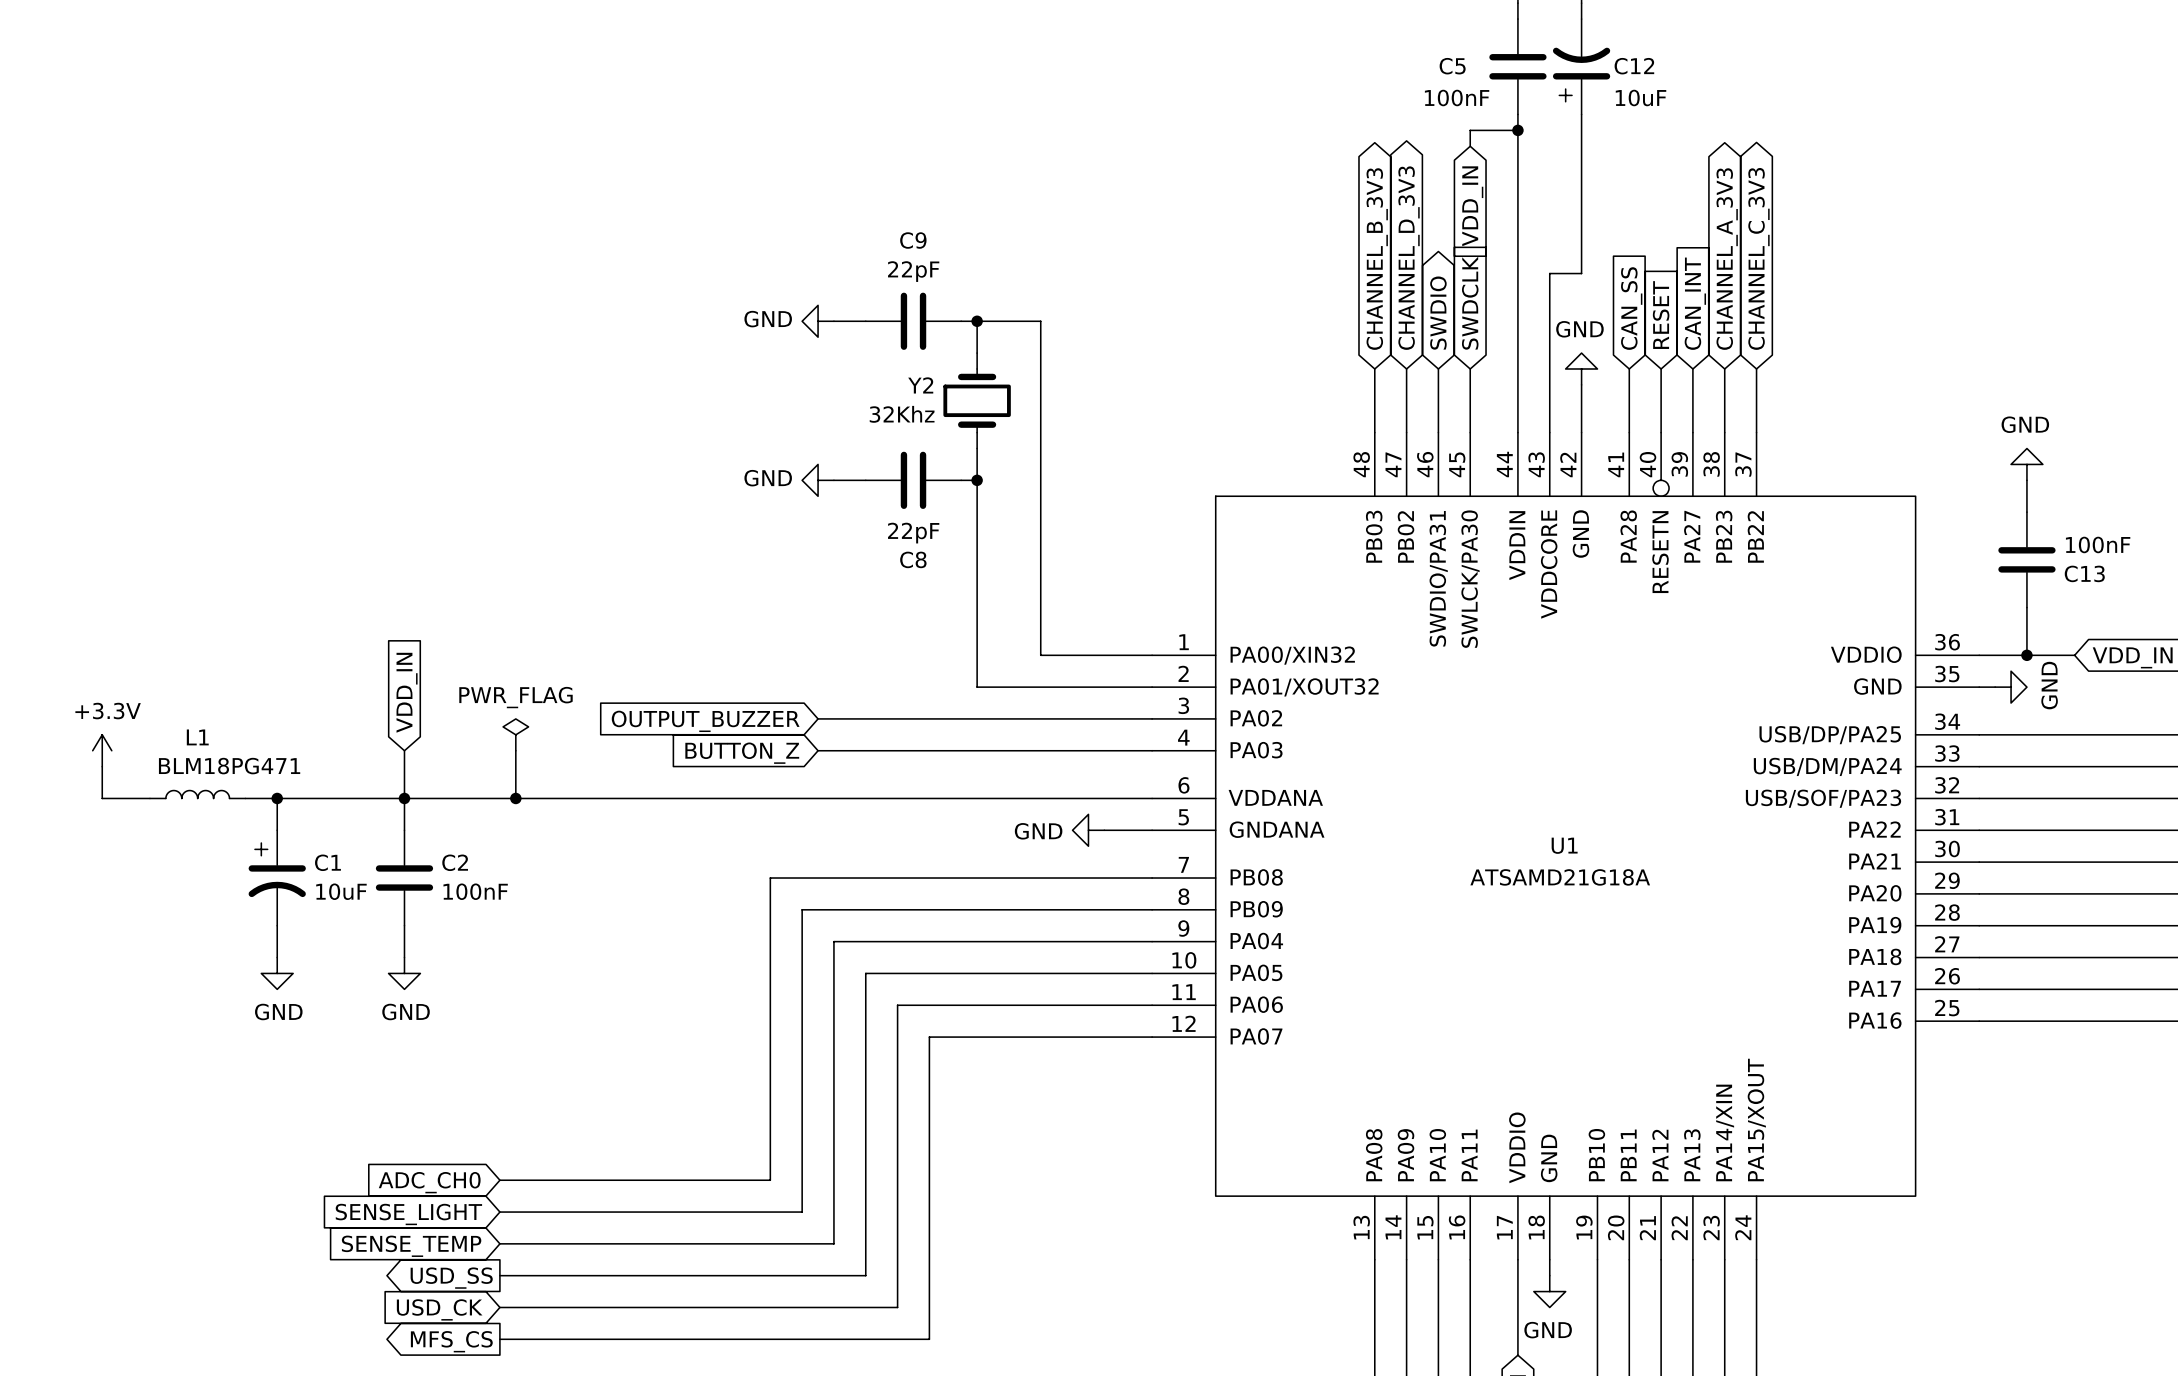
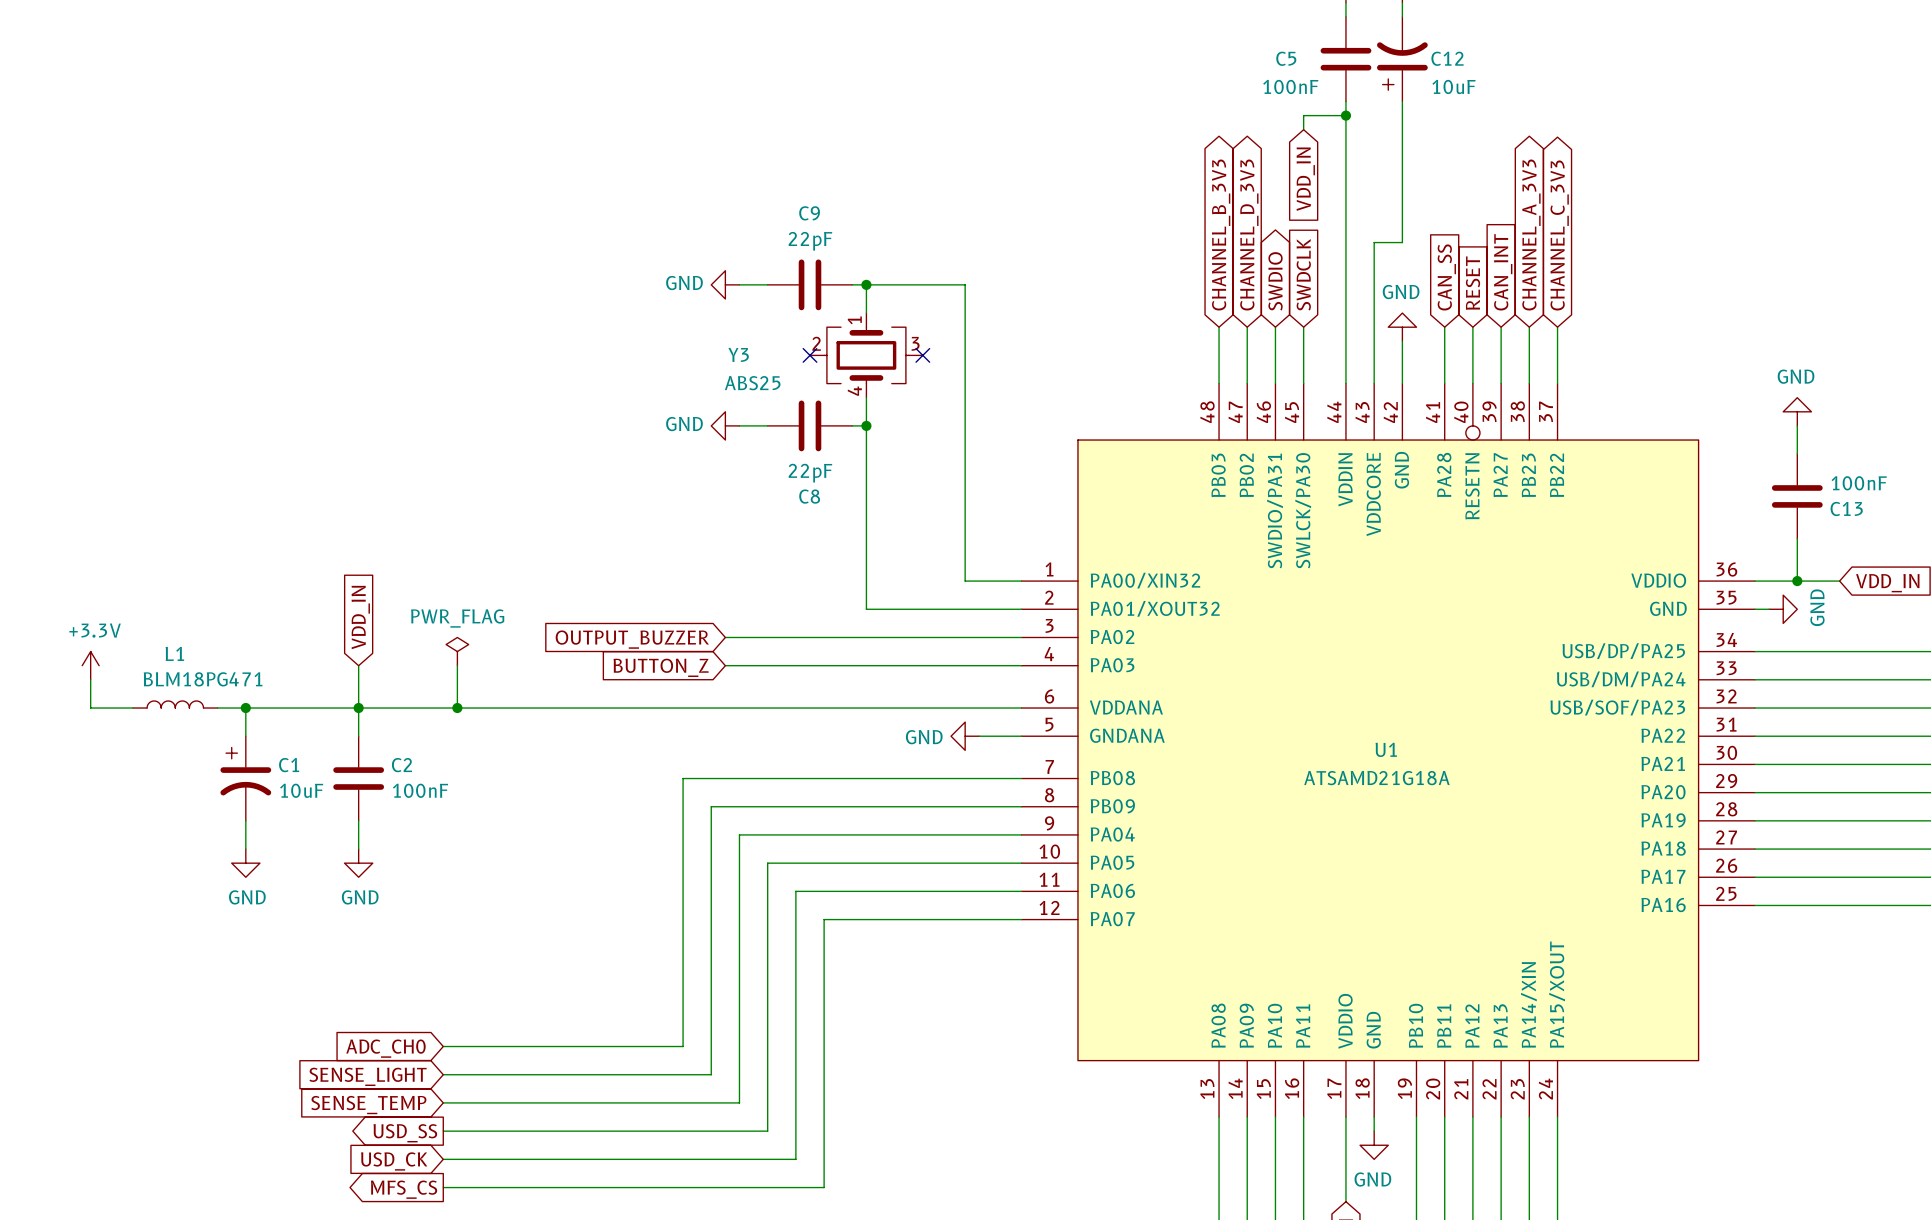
wire: (1040, 321) (1040, 655) (1088, 655) -> (922, 284) (965, 284) (965, 581)
no-connect mark: none -> (810, 355)
Y2: 32Khz (977, 400) -> none
Y3: none -> ABS25 (866, 355)
no-connect mark: none -> (922, 355)

